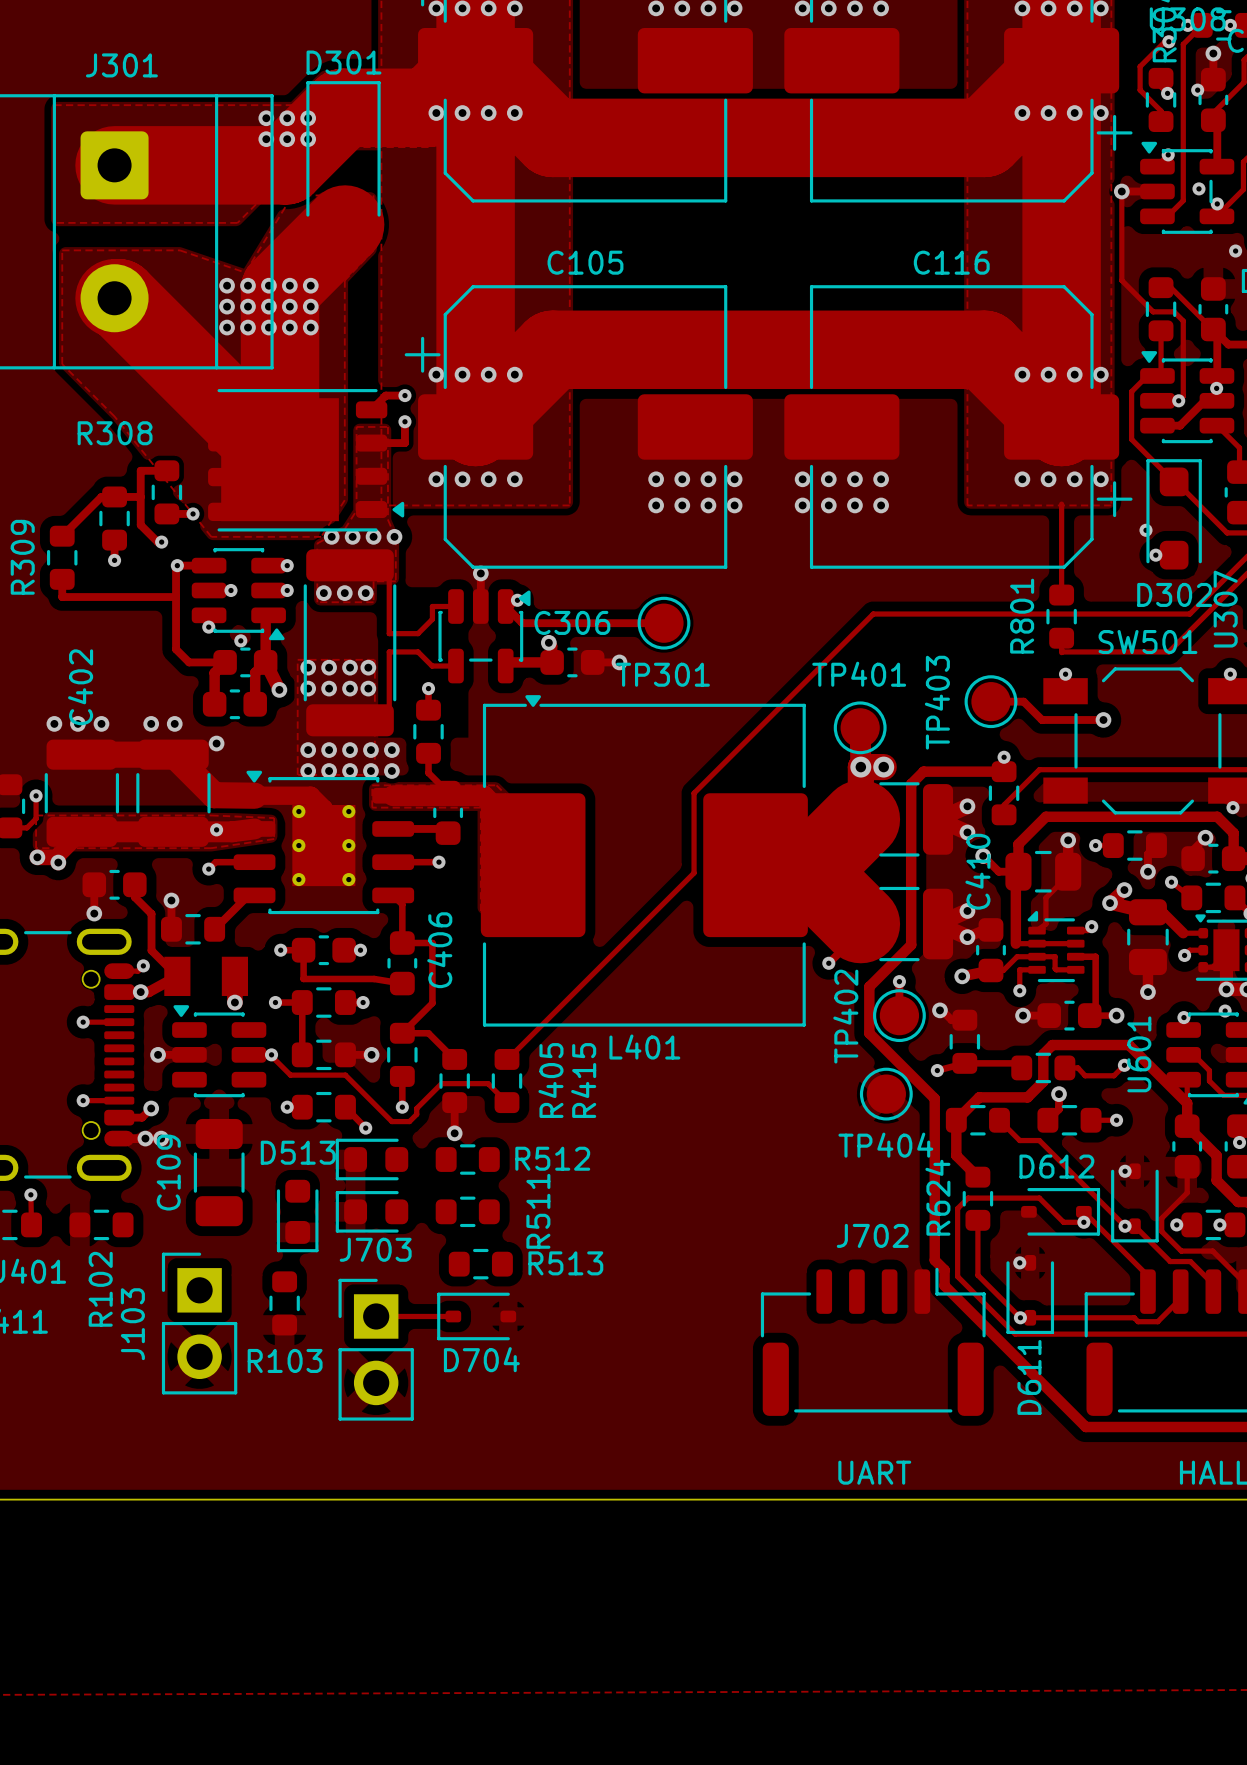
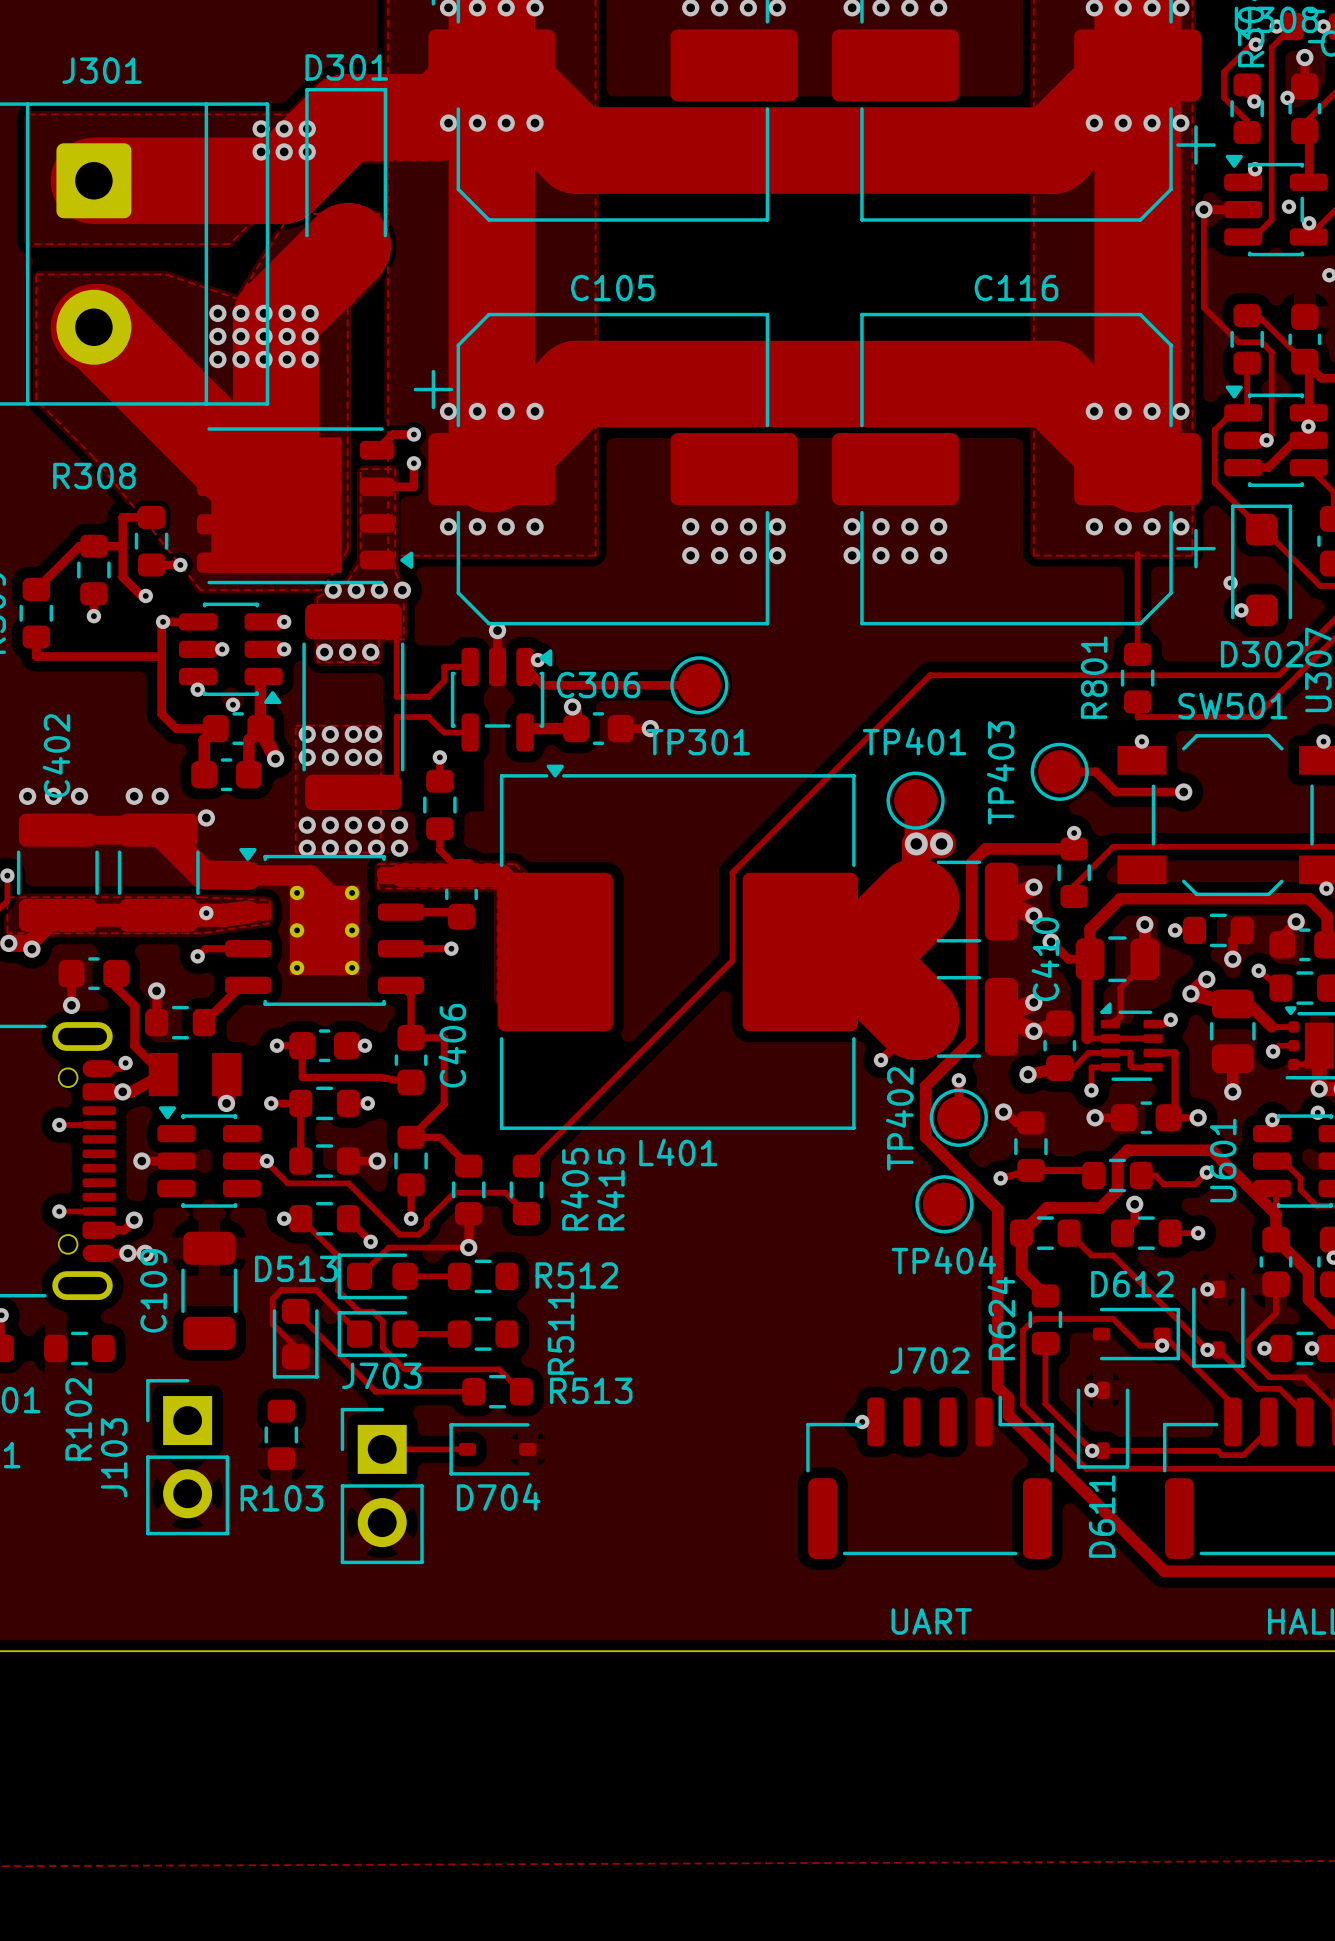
track: none -> (300, 1218) (338, 1256) (338, 1290) (359, 1311) (372, 1311) (382, 1321) (382, 1347) (404, 1369) (498, 1369) (521, 1391)
track: none -> (468, 1247) (388, 1247) (359, 1276)
track: none -> (404, 1276) (459, 1276)
track: none -> (295, 1311) (375, 1391) (473, 1391)
track: none -> (359, 1334) (315, 1290) (281, 1290) (272, 1298) (272, 1323) (295, 1347) (295, 1356)
track: none -> (404, 1334) (459, 1334)
via: none -> (862, 1421)

